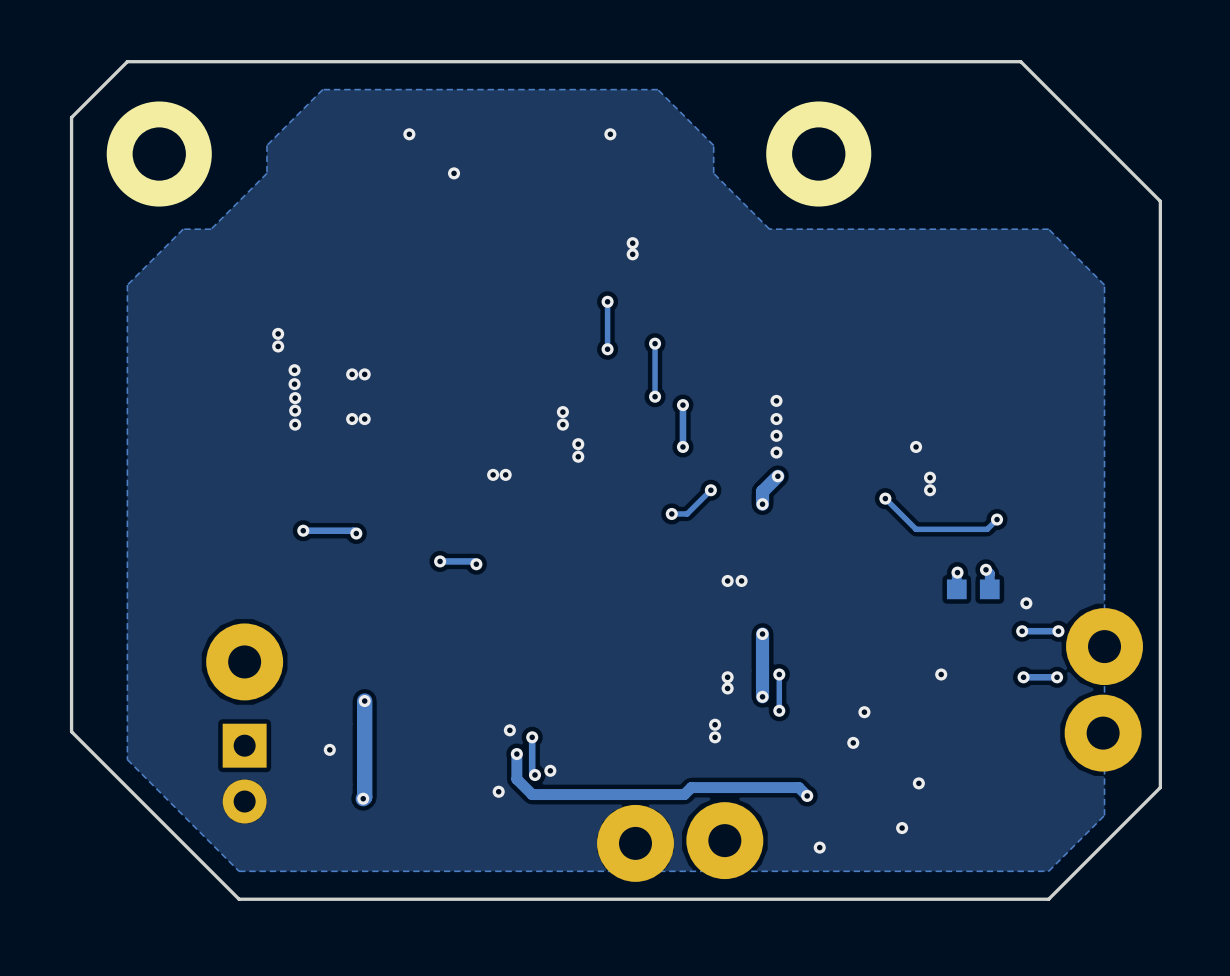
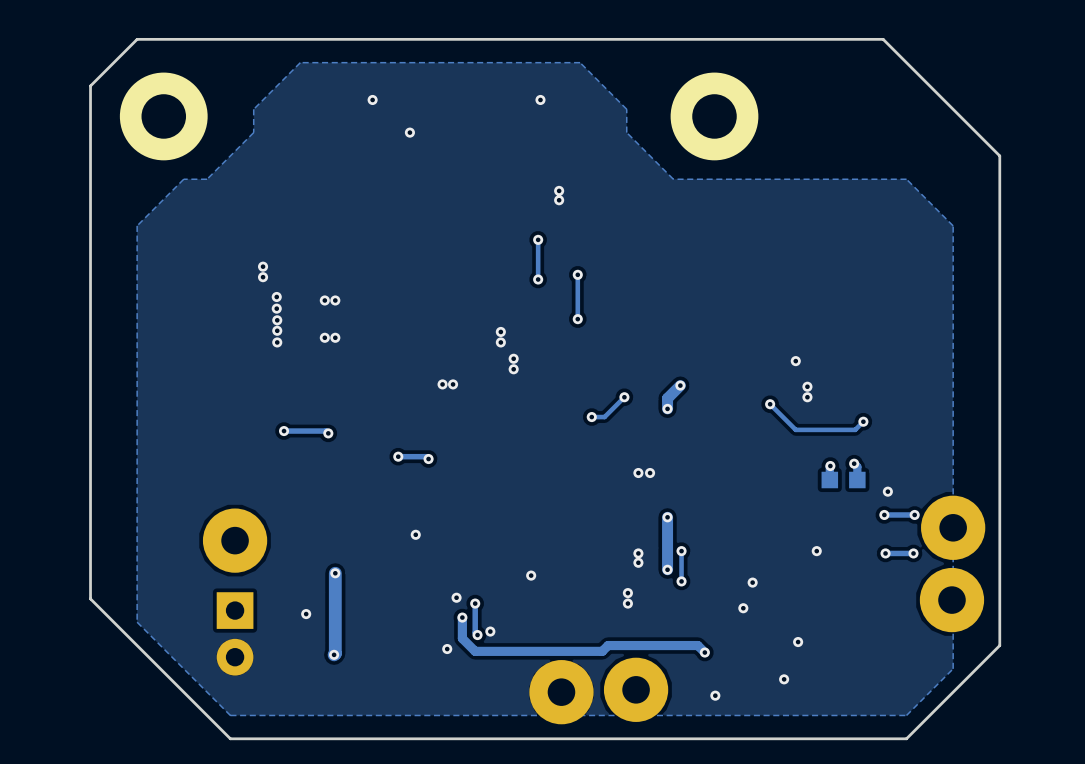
via: (776, 400) -> none
track: (682, 405) (682, 446) -> none
via: (682, 405) -> none
via: (776, 419) -> none
via: (776, 435) -> none
via: (682, 446) -> none
via: (776, 452) -> none
via: none -> (415, 534)
via: none -> (531, 575)

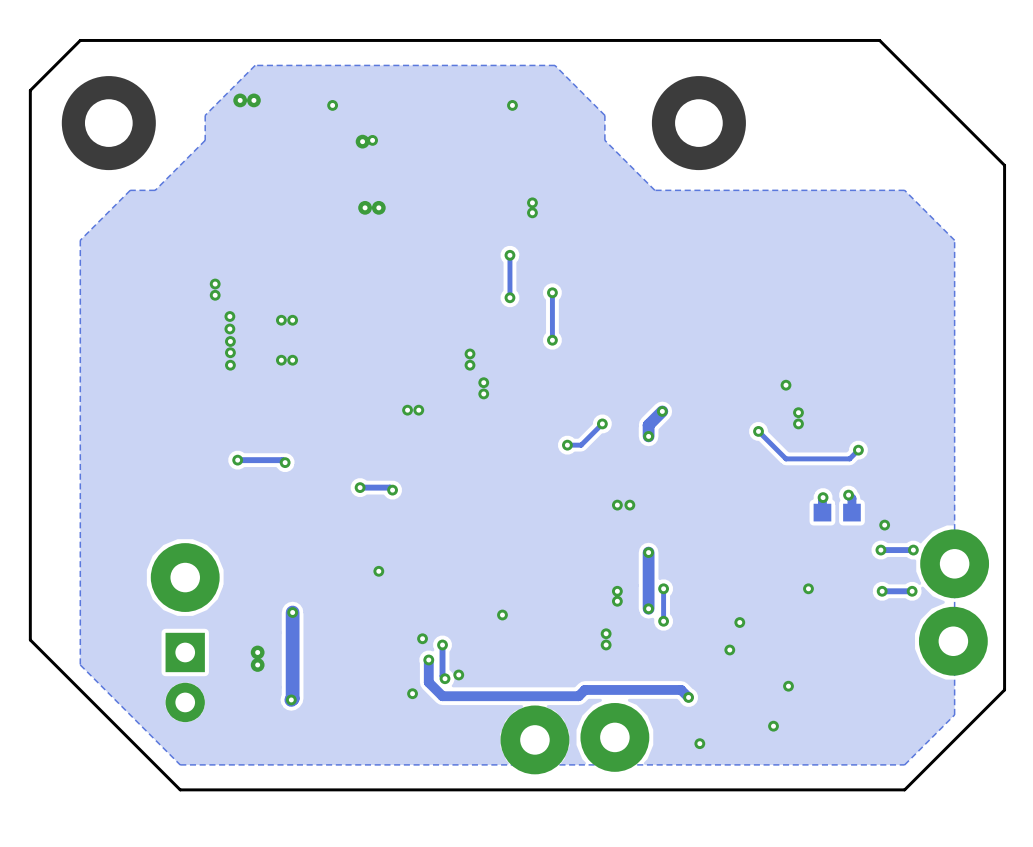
via: none -> (240, 100)
via: none -> (253, 100)
via: none -> (362, 141)
via: none -> (365, 207)
via: none -> (378, 207)
via: none -> (257, 652)
via: (306, 614) -> none
via: none -> (257, 664)

